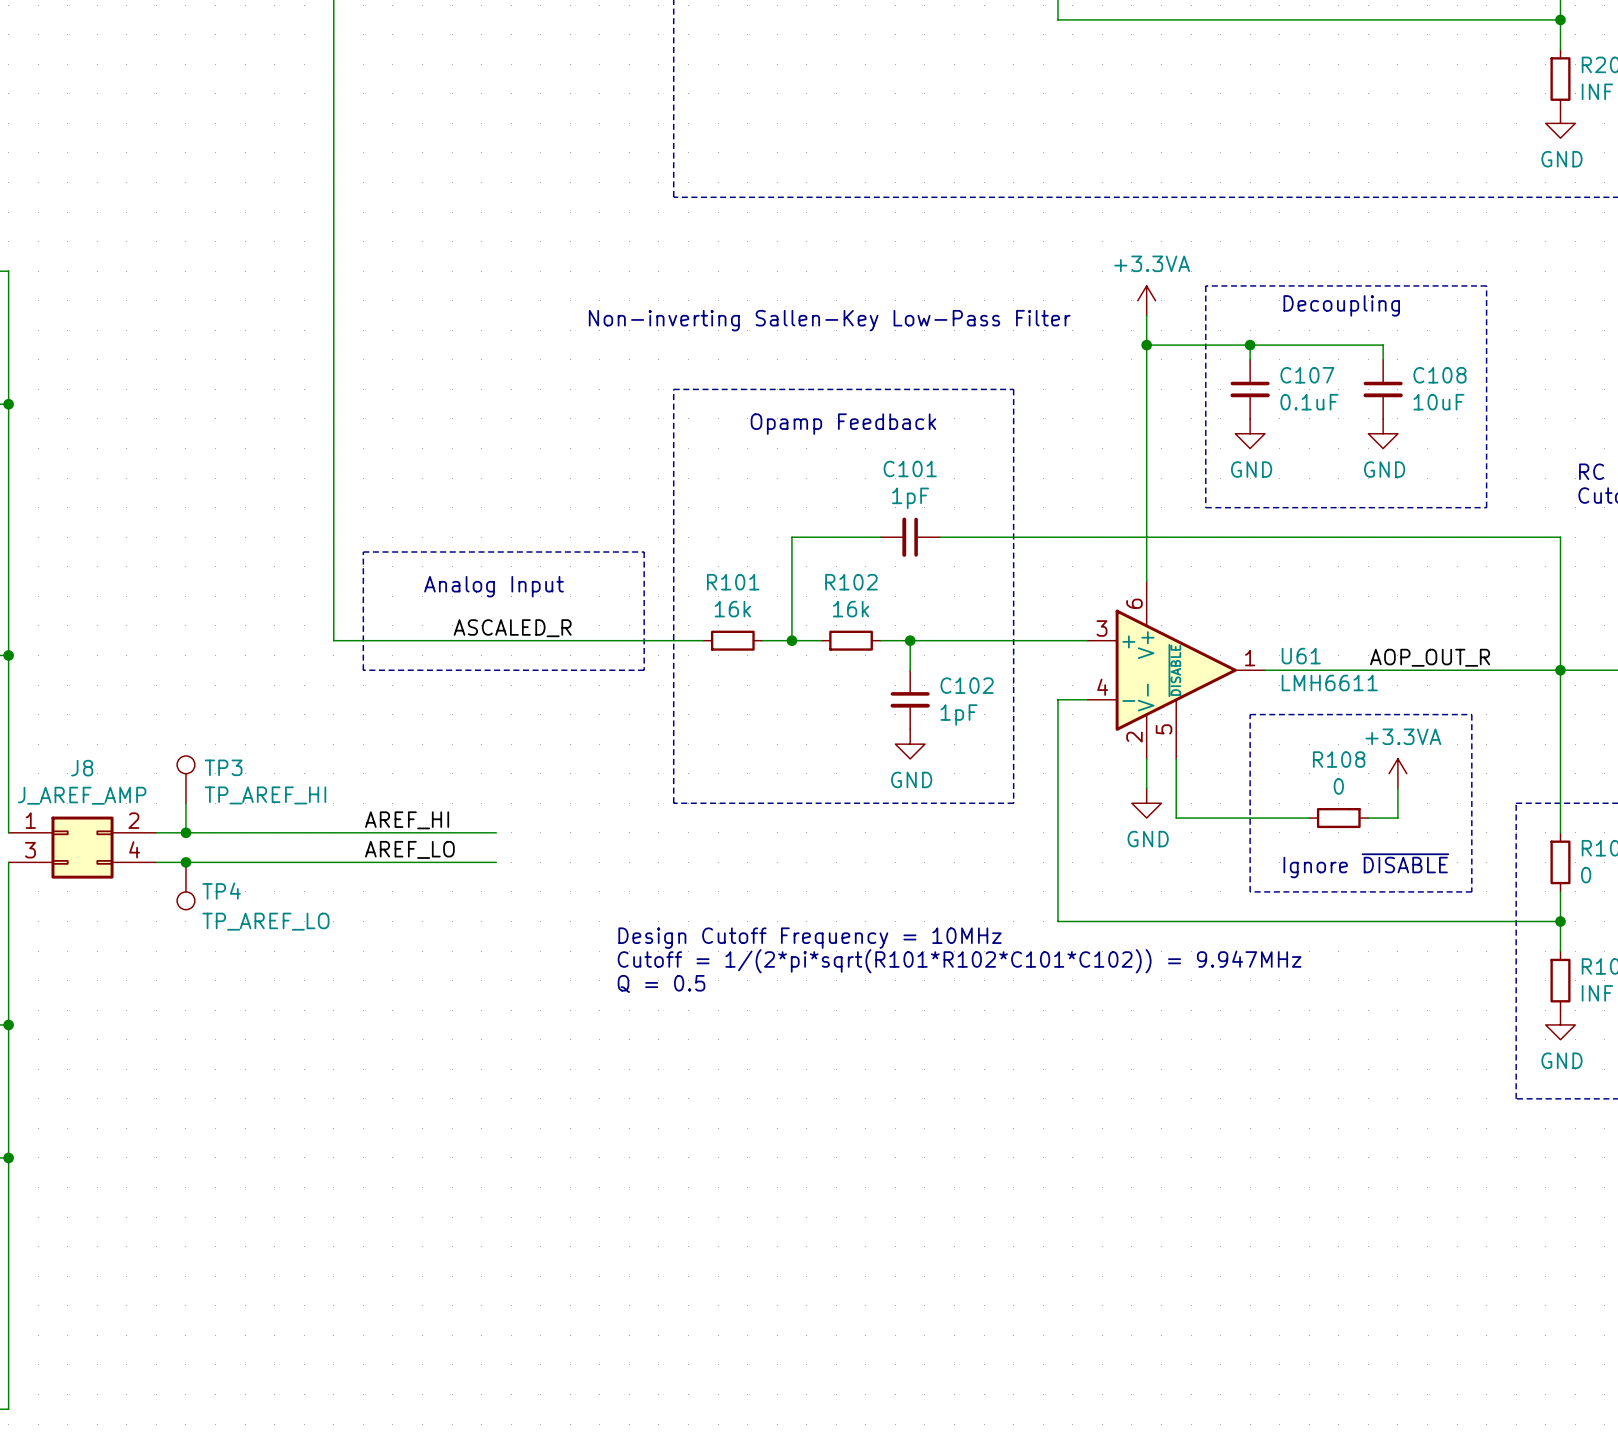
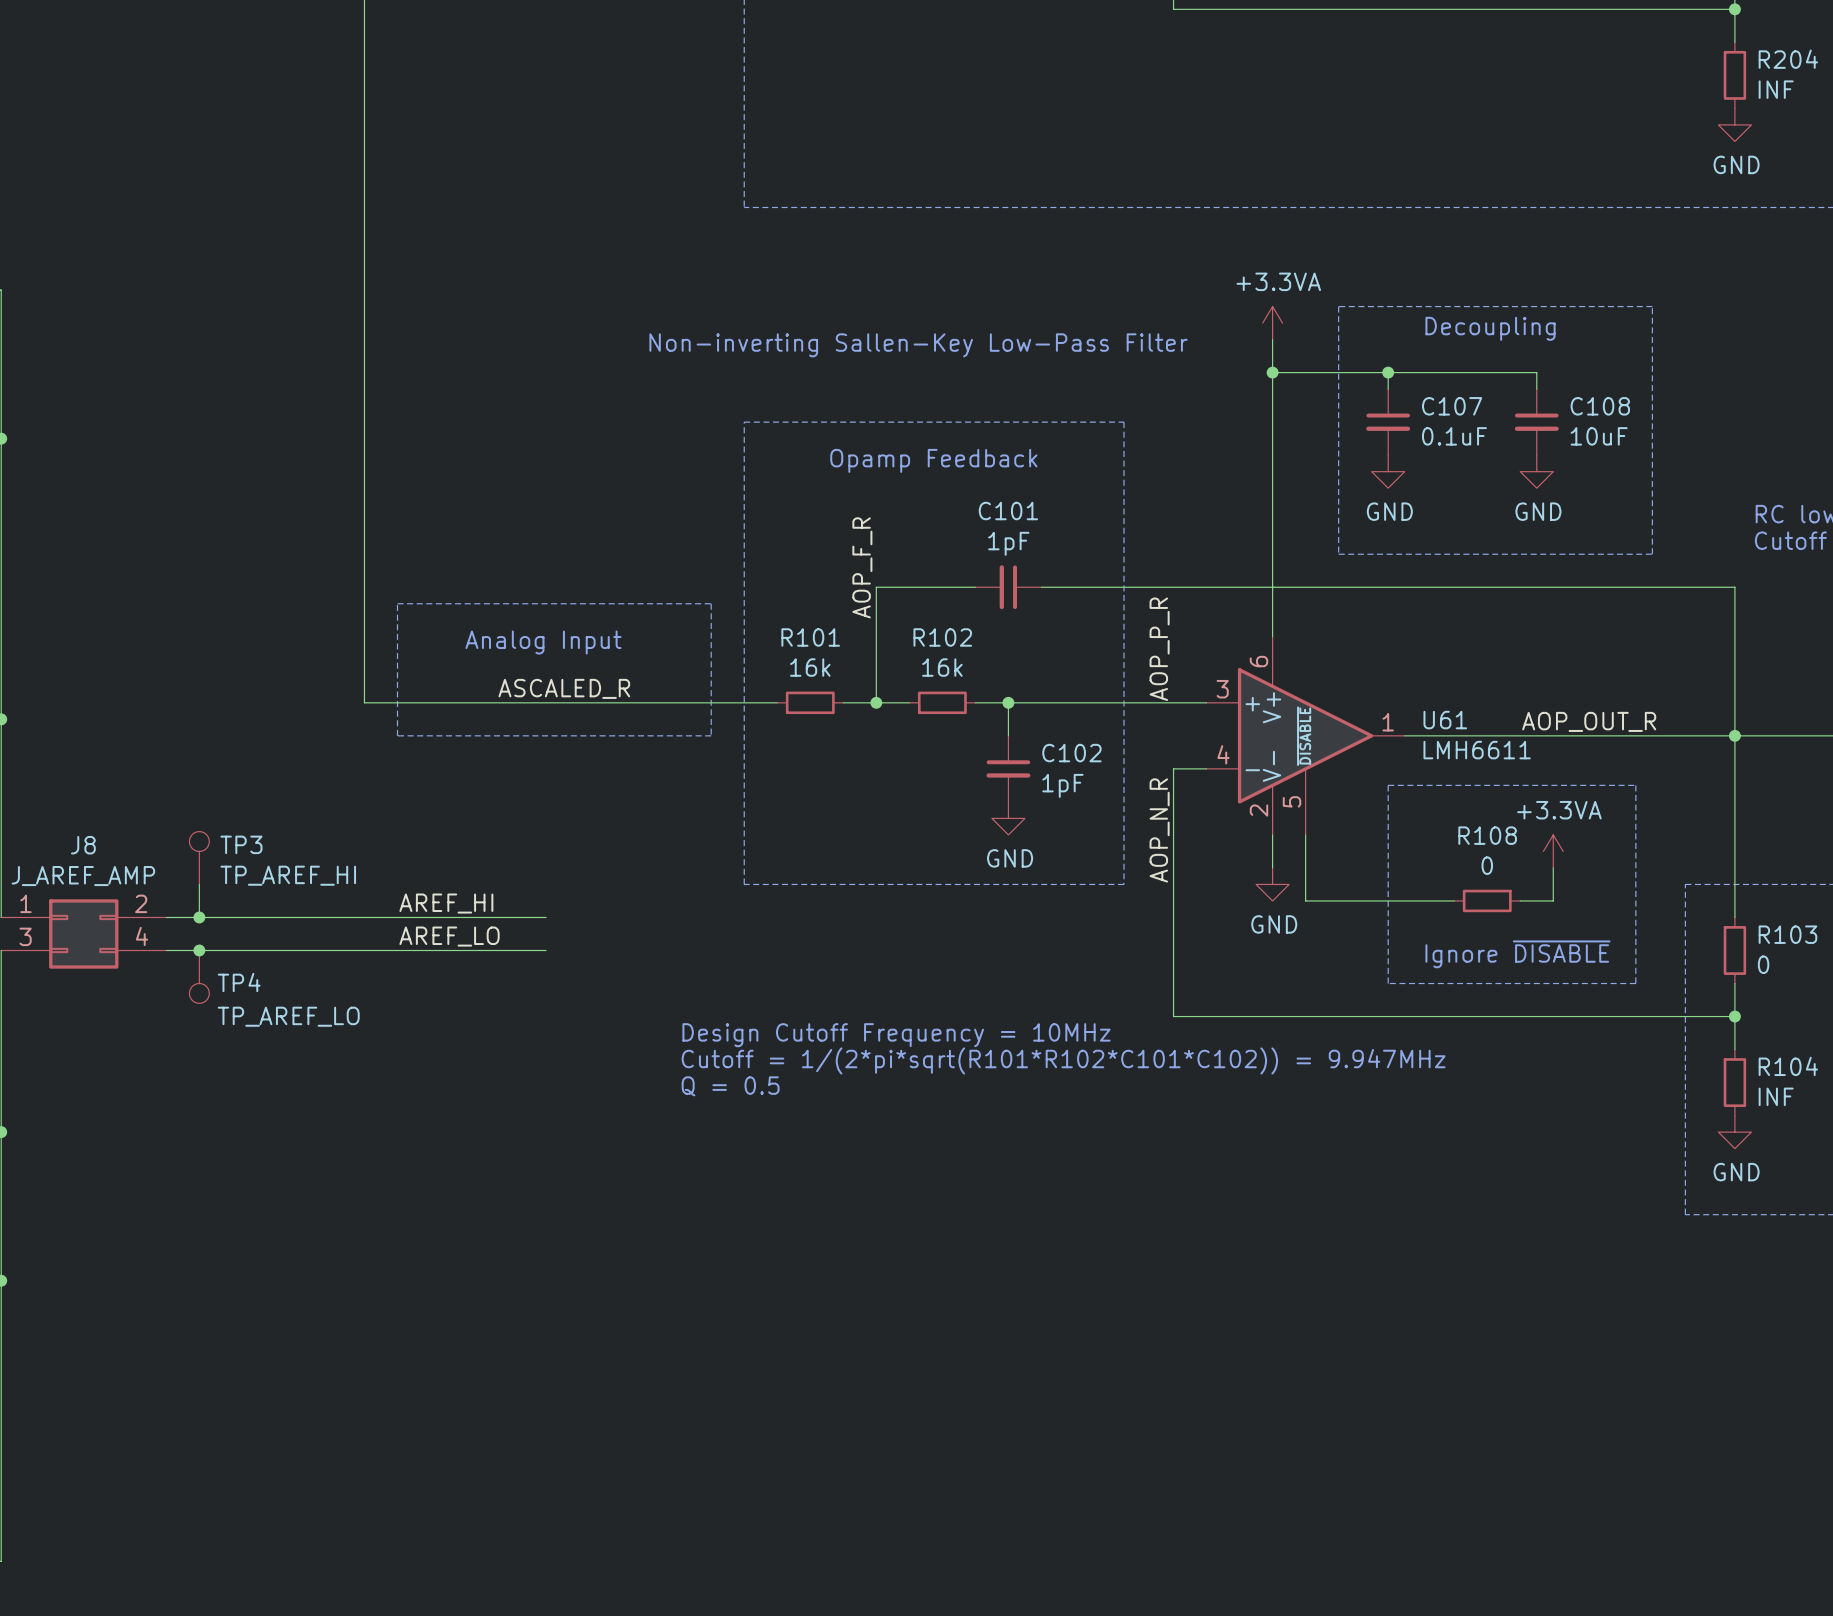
label: none -> AOP_F_R (862, 567)
label: none -> AOP_P_R (1159, 649)
label: none -> AOP_N_R (1159, 830)

